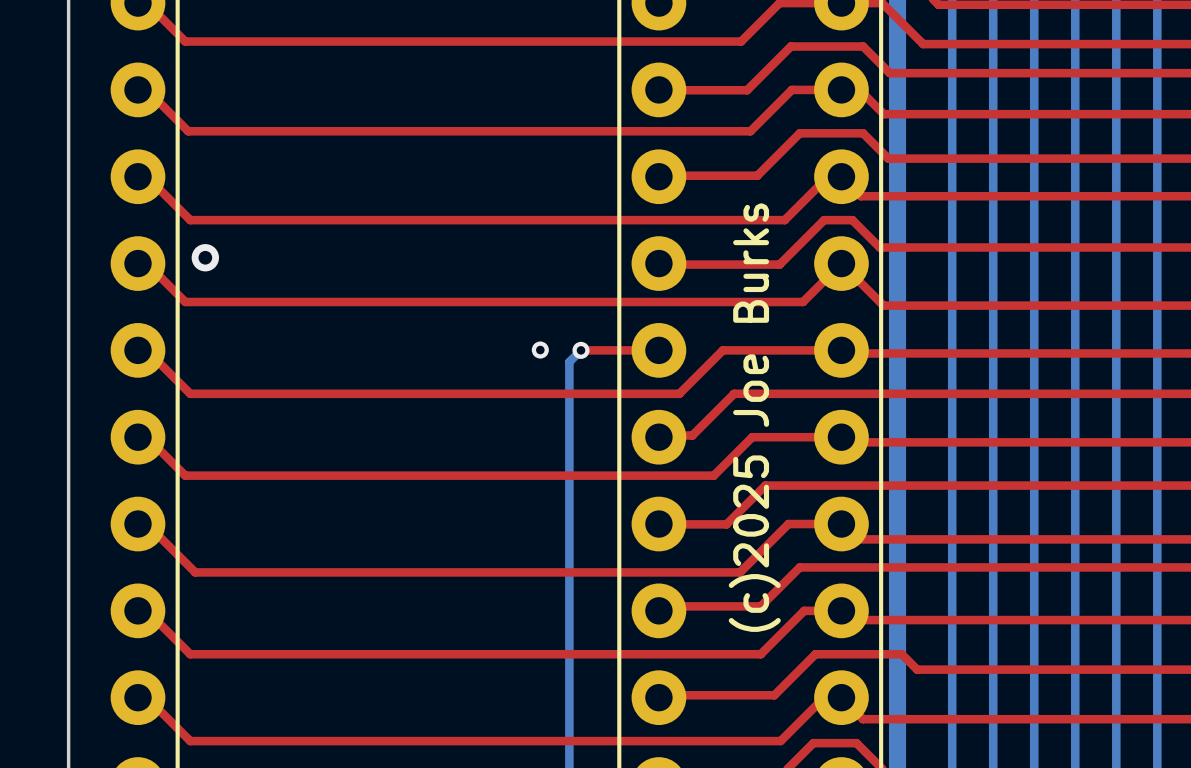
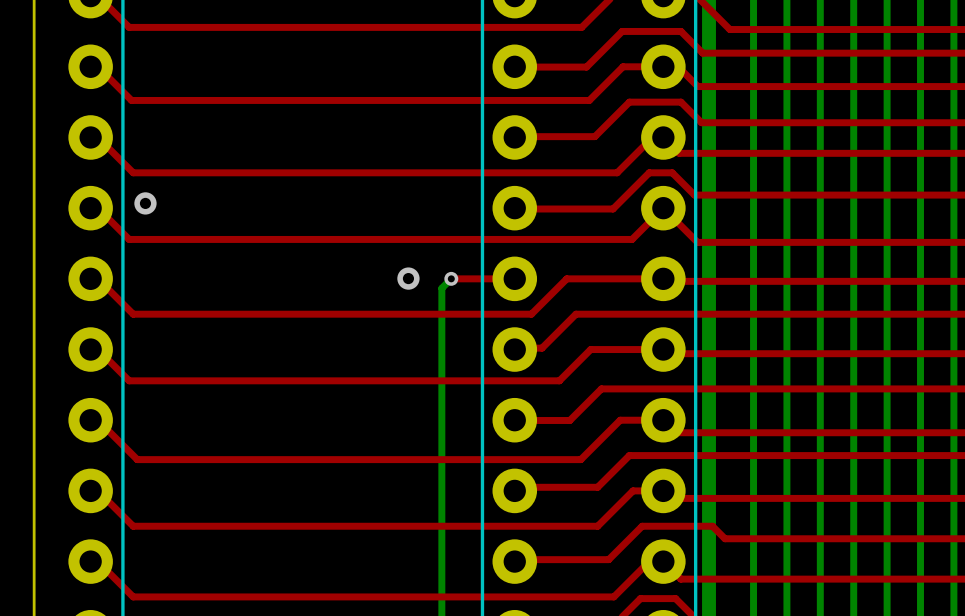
via size: [531, 341, 549, 359] -> [397, 267, 420, 290]
text: (c)2025 Joe Burks (754, 417) -> none

